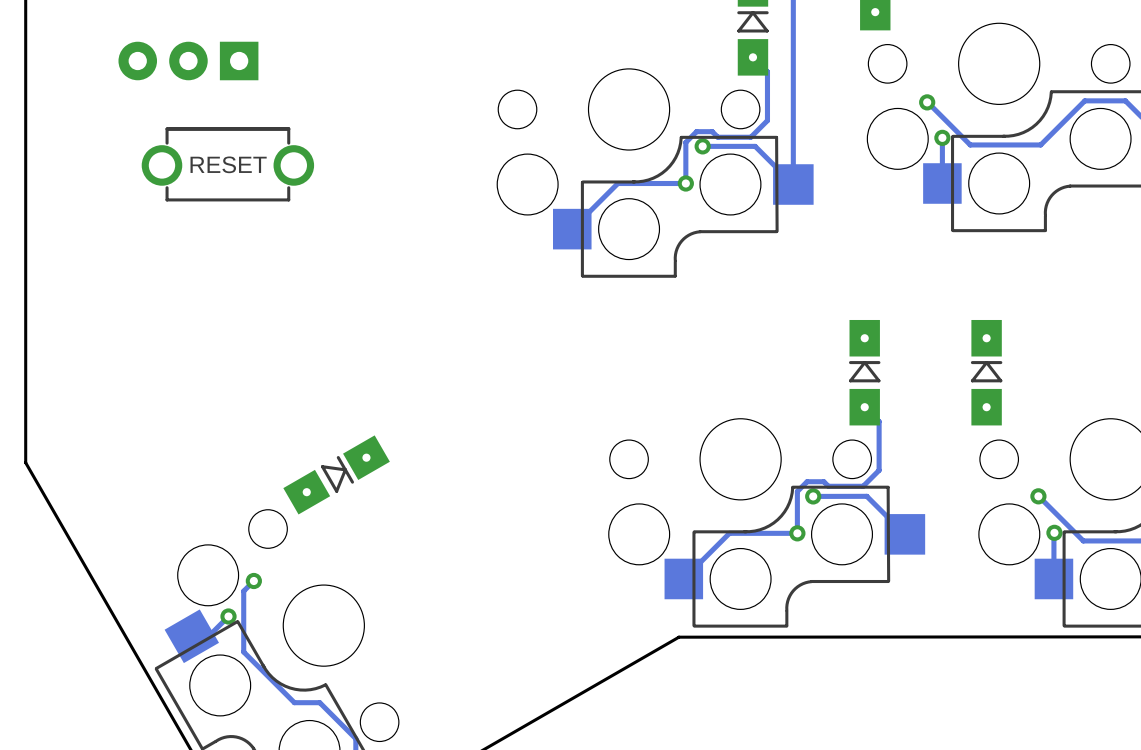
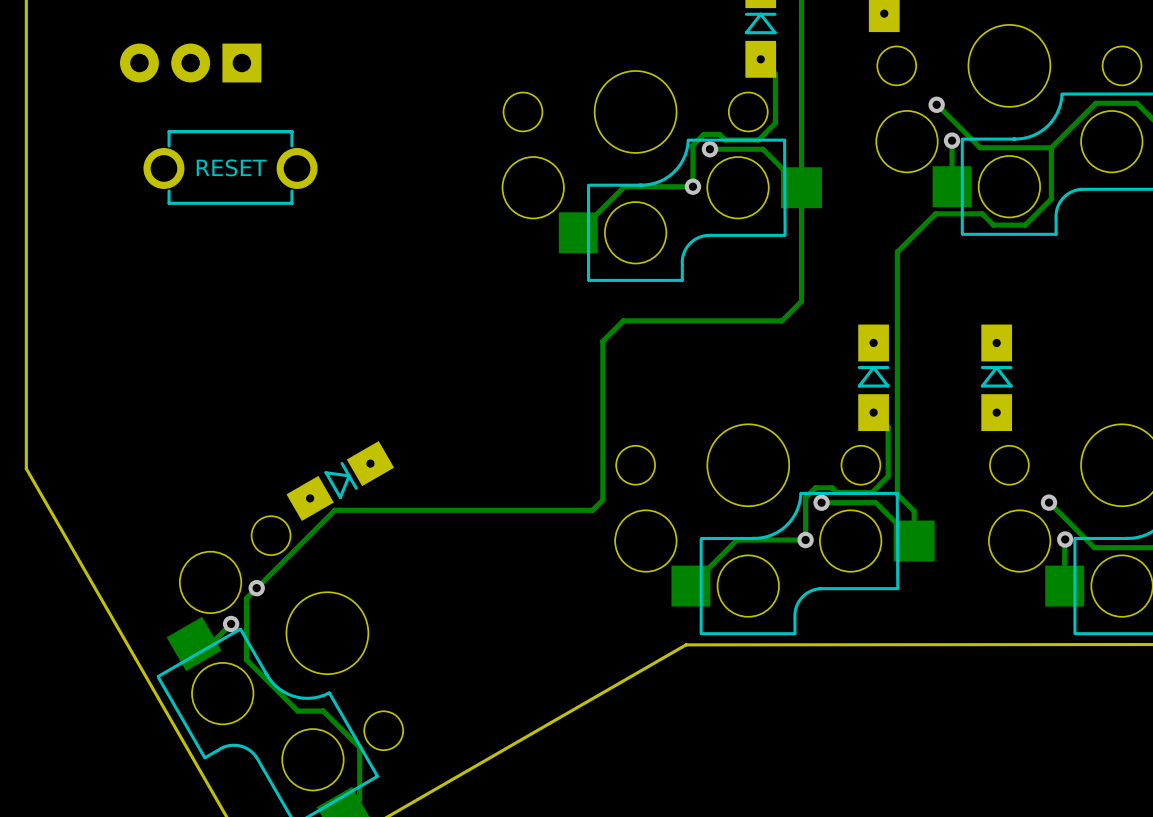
track: none -> (1051, 147) (1051, 199) (1025, 225) (993, 225) (982, 213) (935, 213) (897, 252) (897, 494) (914, 511) (914, 541)
track: none -> (801, 187) (801, 301) (782, 320) (623, 320) (602, 341) (602, 500) (592, 510) (334, 510) (256, 588)

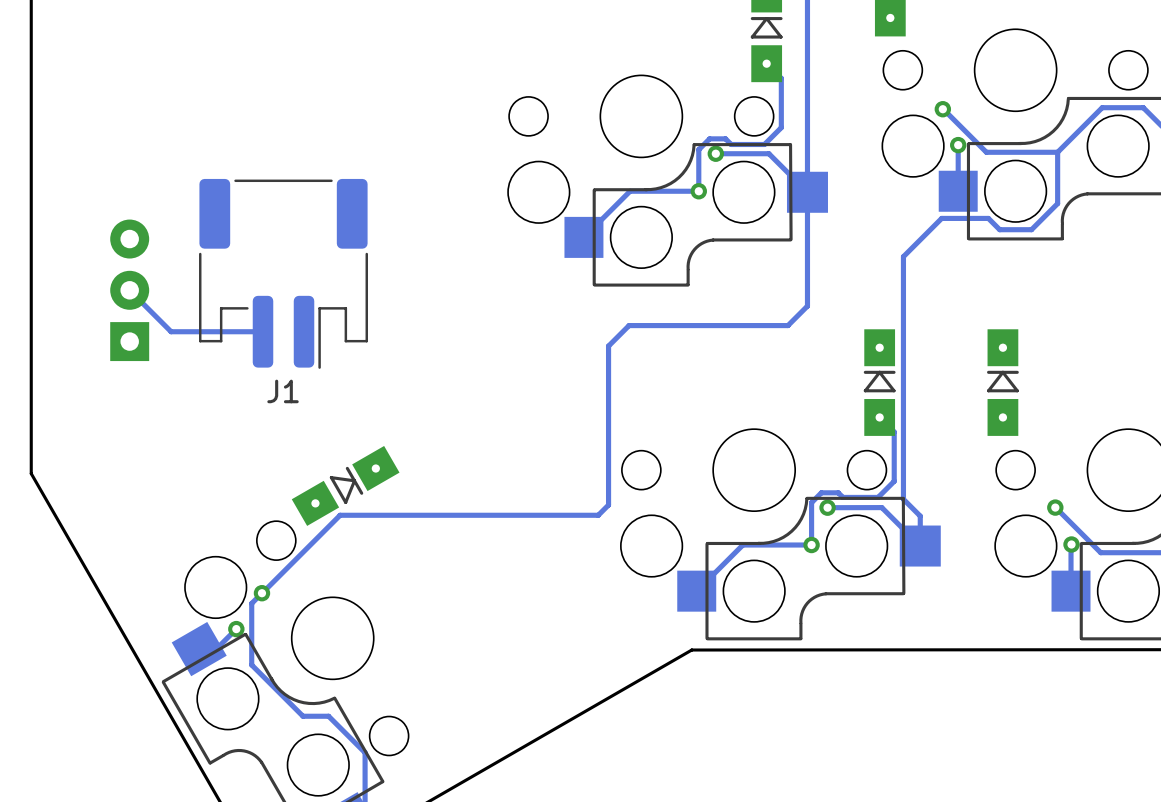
part rotation: 0° (190, 63) -> 90° clockwise (129, 290)
part position: (190, 63) -> (129, 290)
part: (230, 167) -> none
J1: none -> (283, 273)
track: none -> (129, 290) (171, 331) (263, 331)

